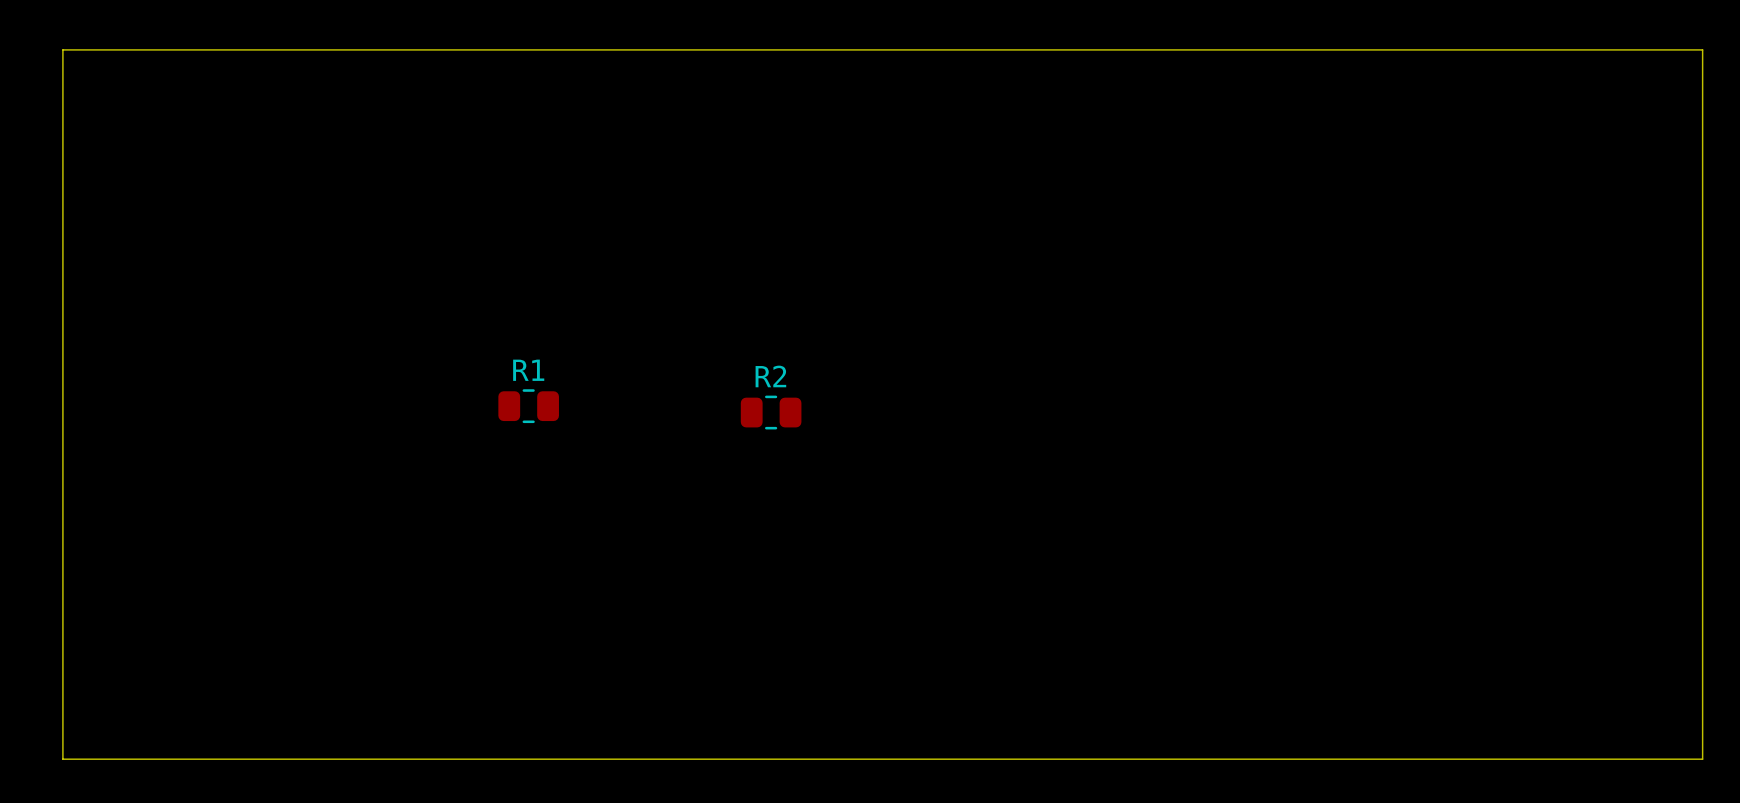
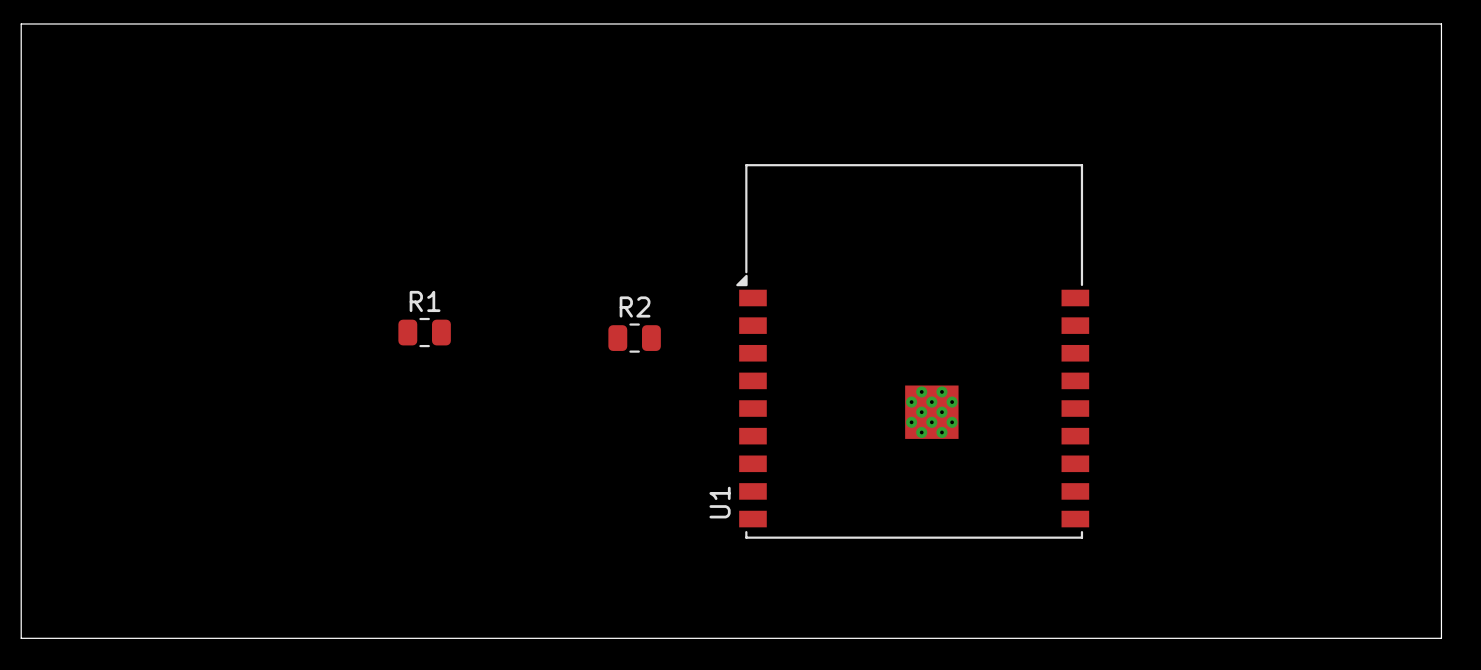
U1: none -> (912, 351)

